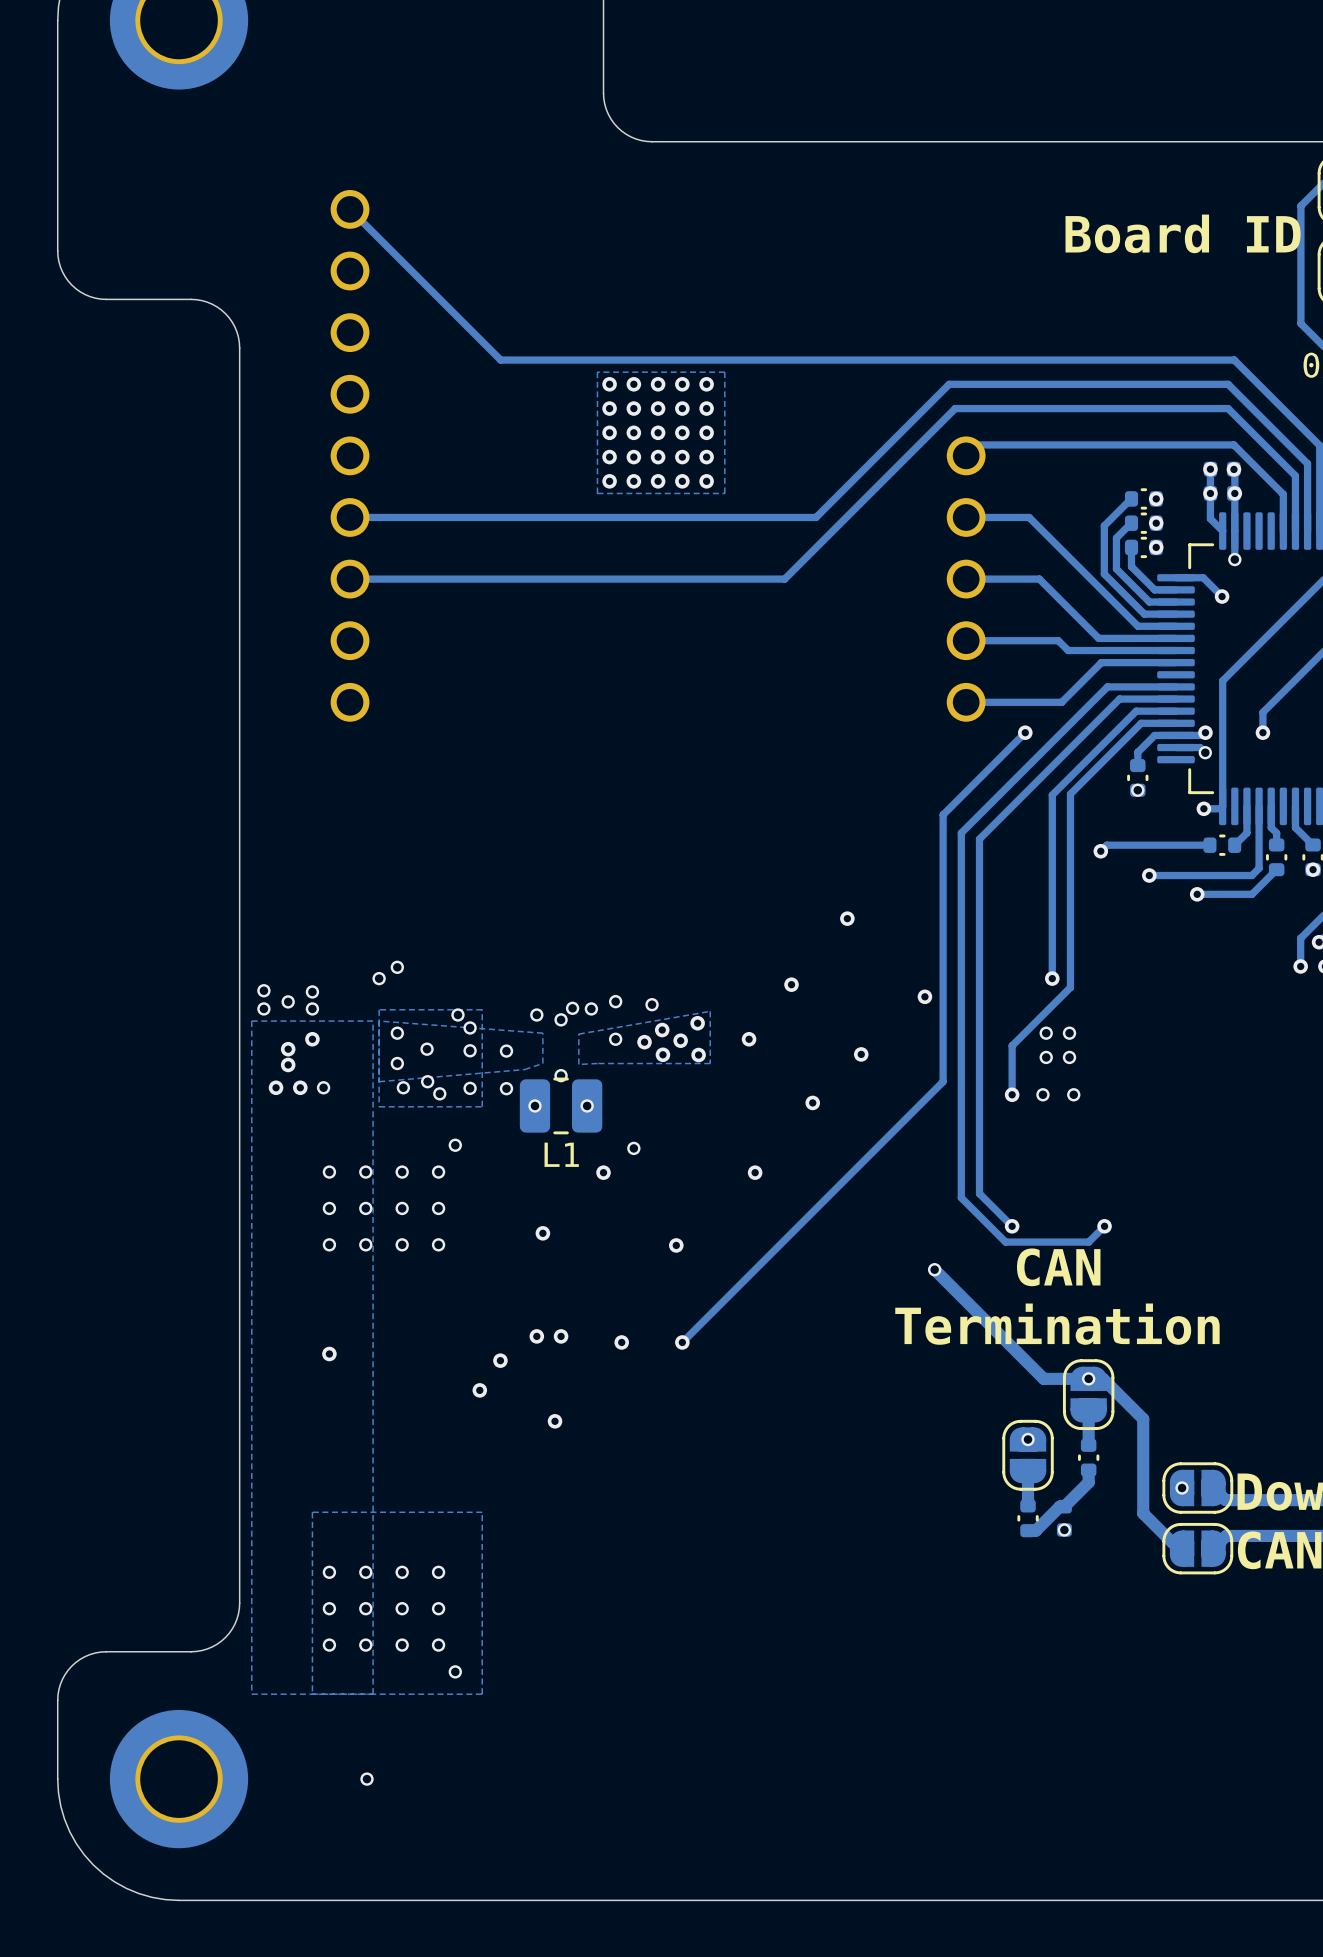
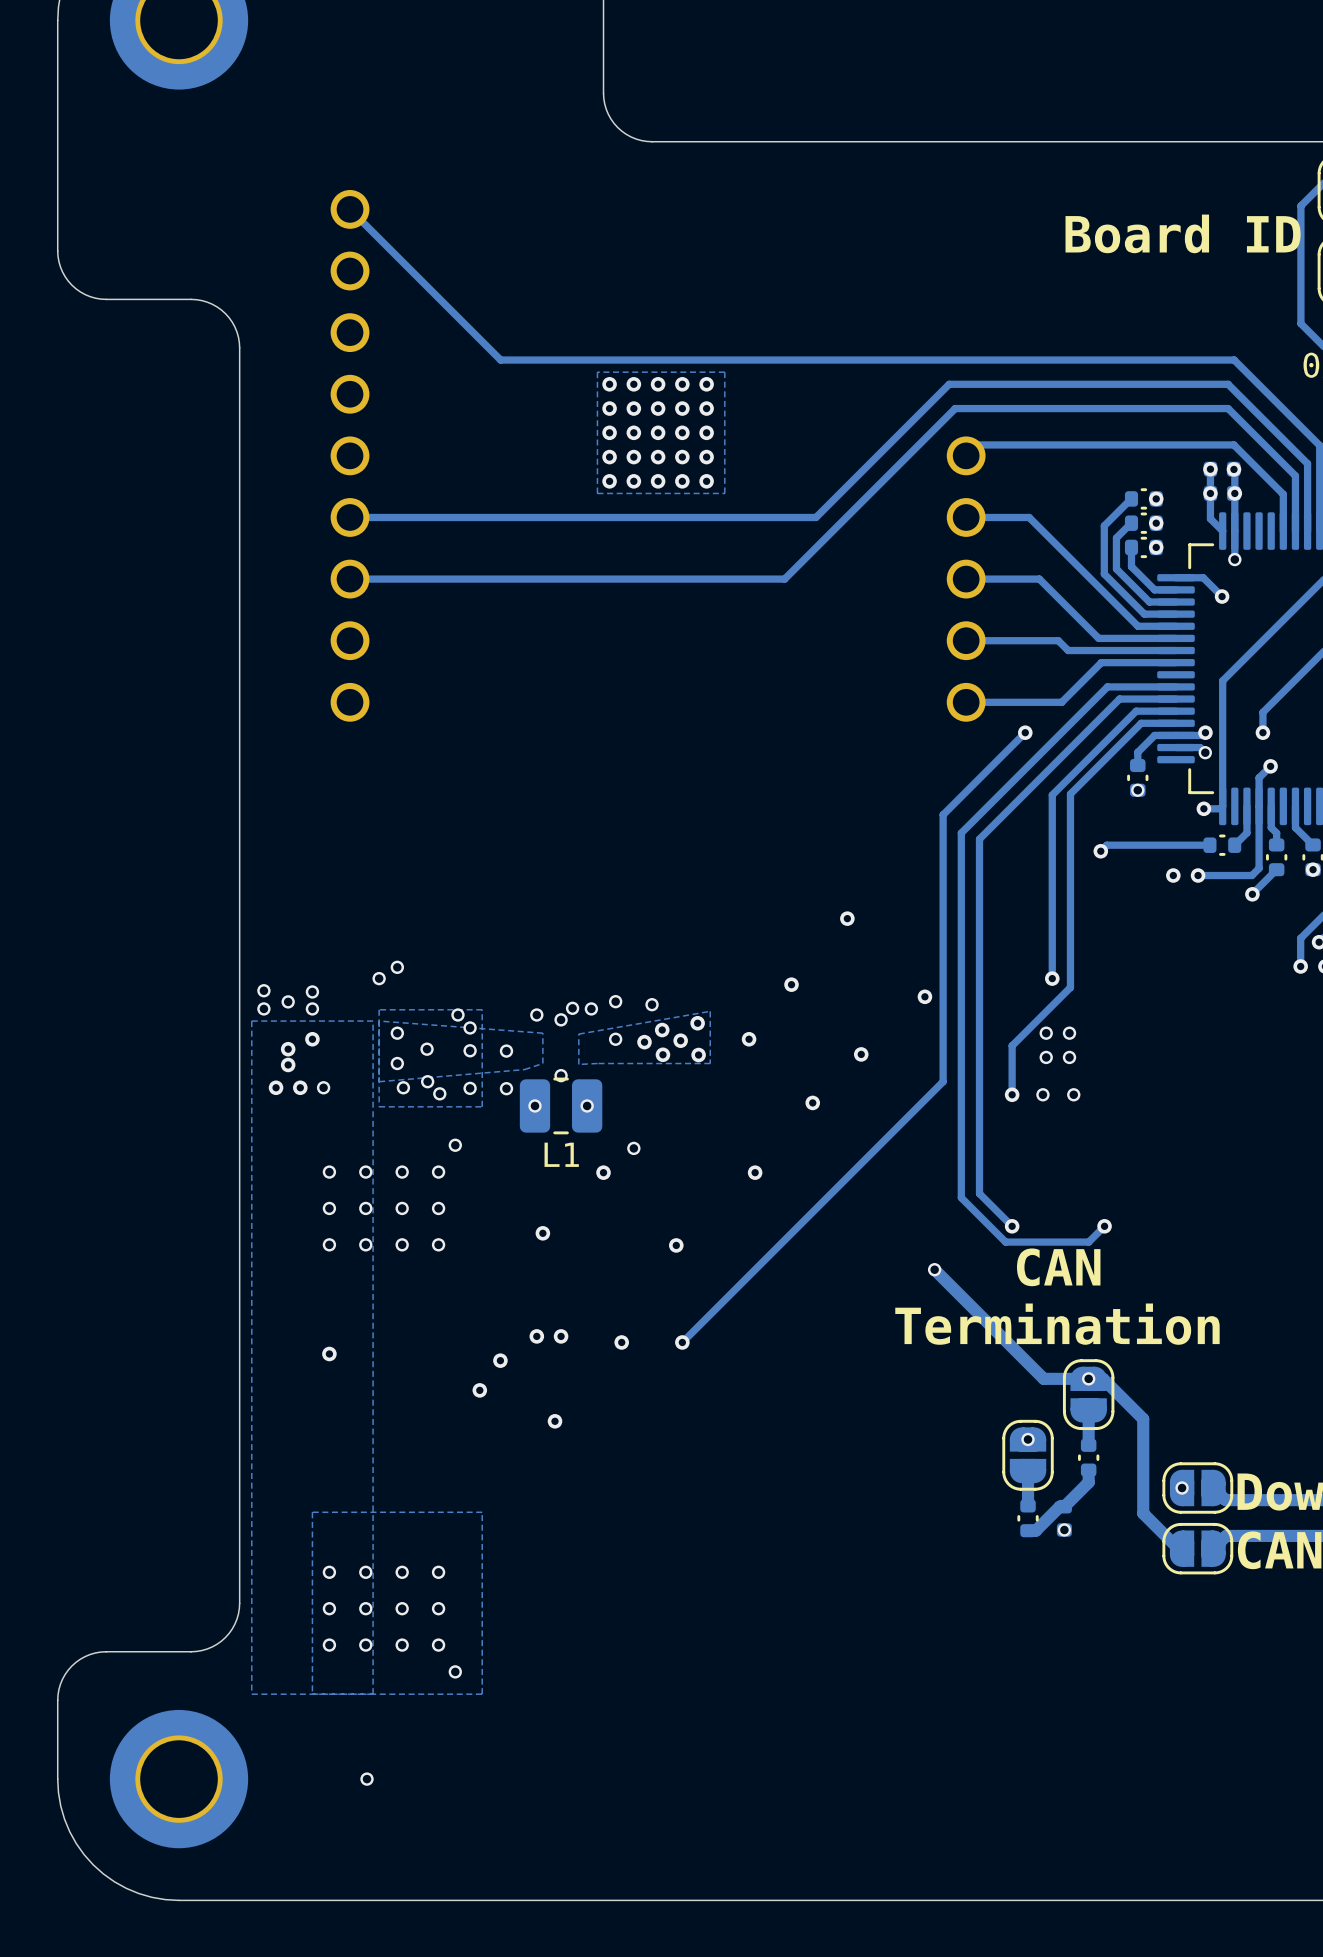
track: none -> (1270, 766) (1259, 777) (1259, 806)
via: none -> (1270, 766)
via: (1149, 875) -> none
via: none -> (1173, 875)
track: (1198, 875) (1149, 875) -> none
via: none -> (1198, 875)
track: (1252, 893) (1197, 894) -> none
via: (1197, 894) -> none
via: none -> (1252, 894)

